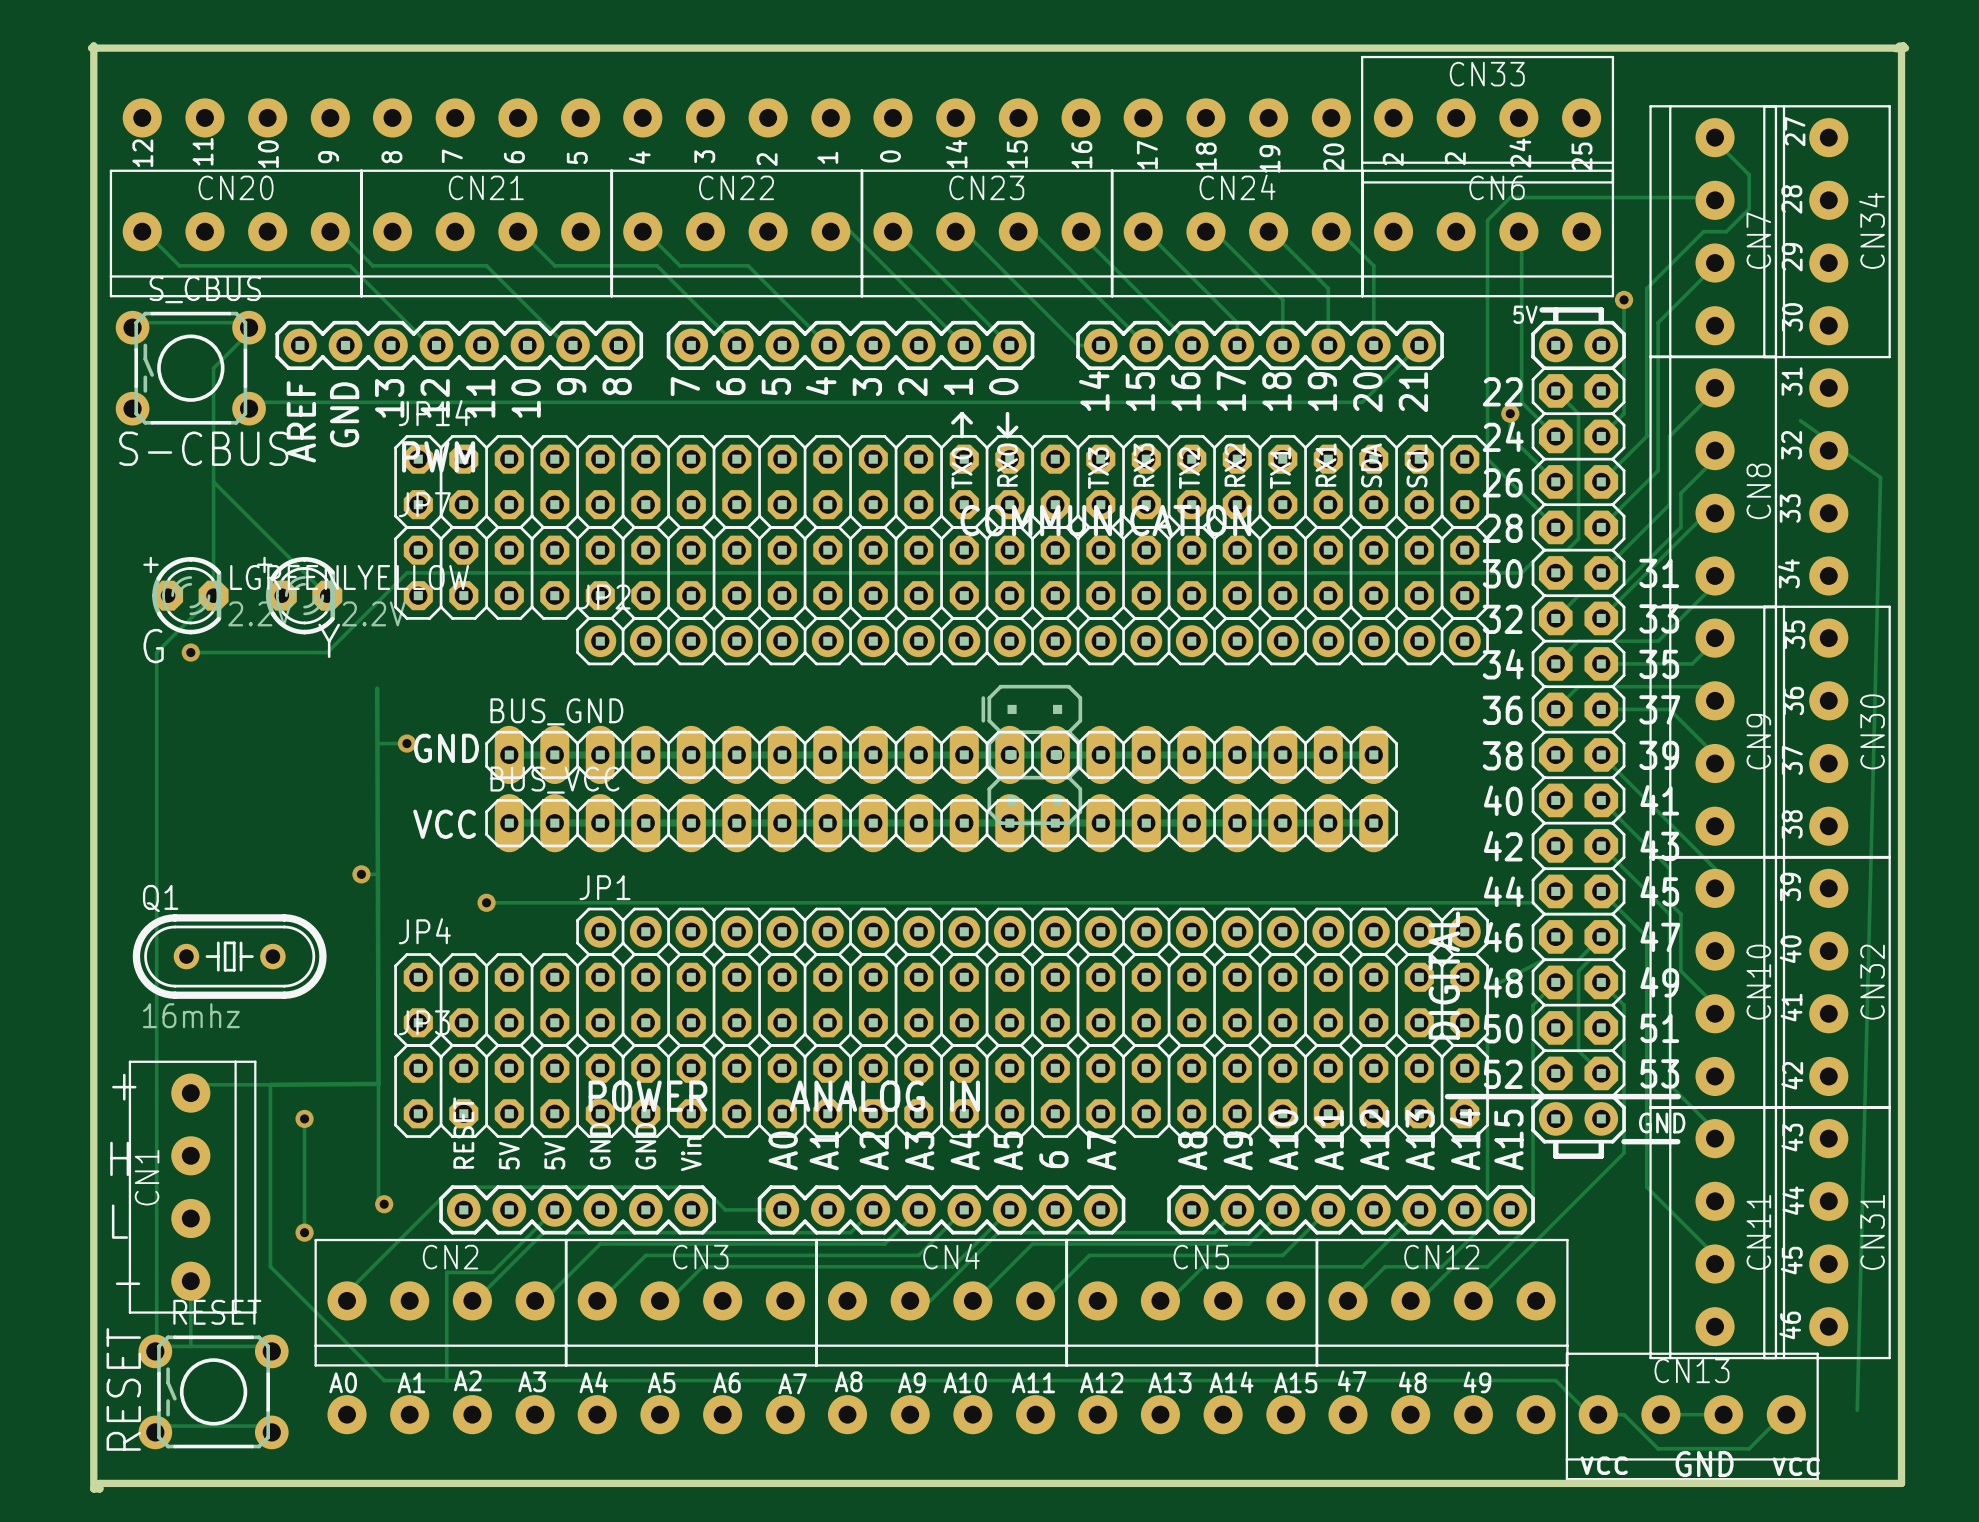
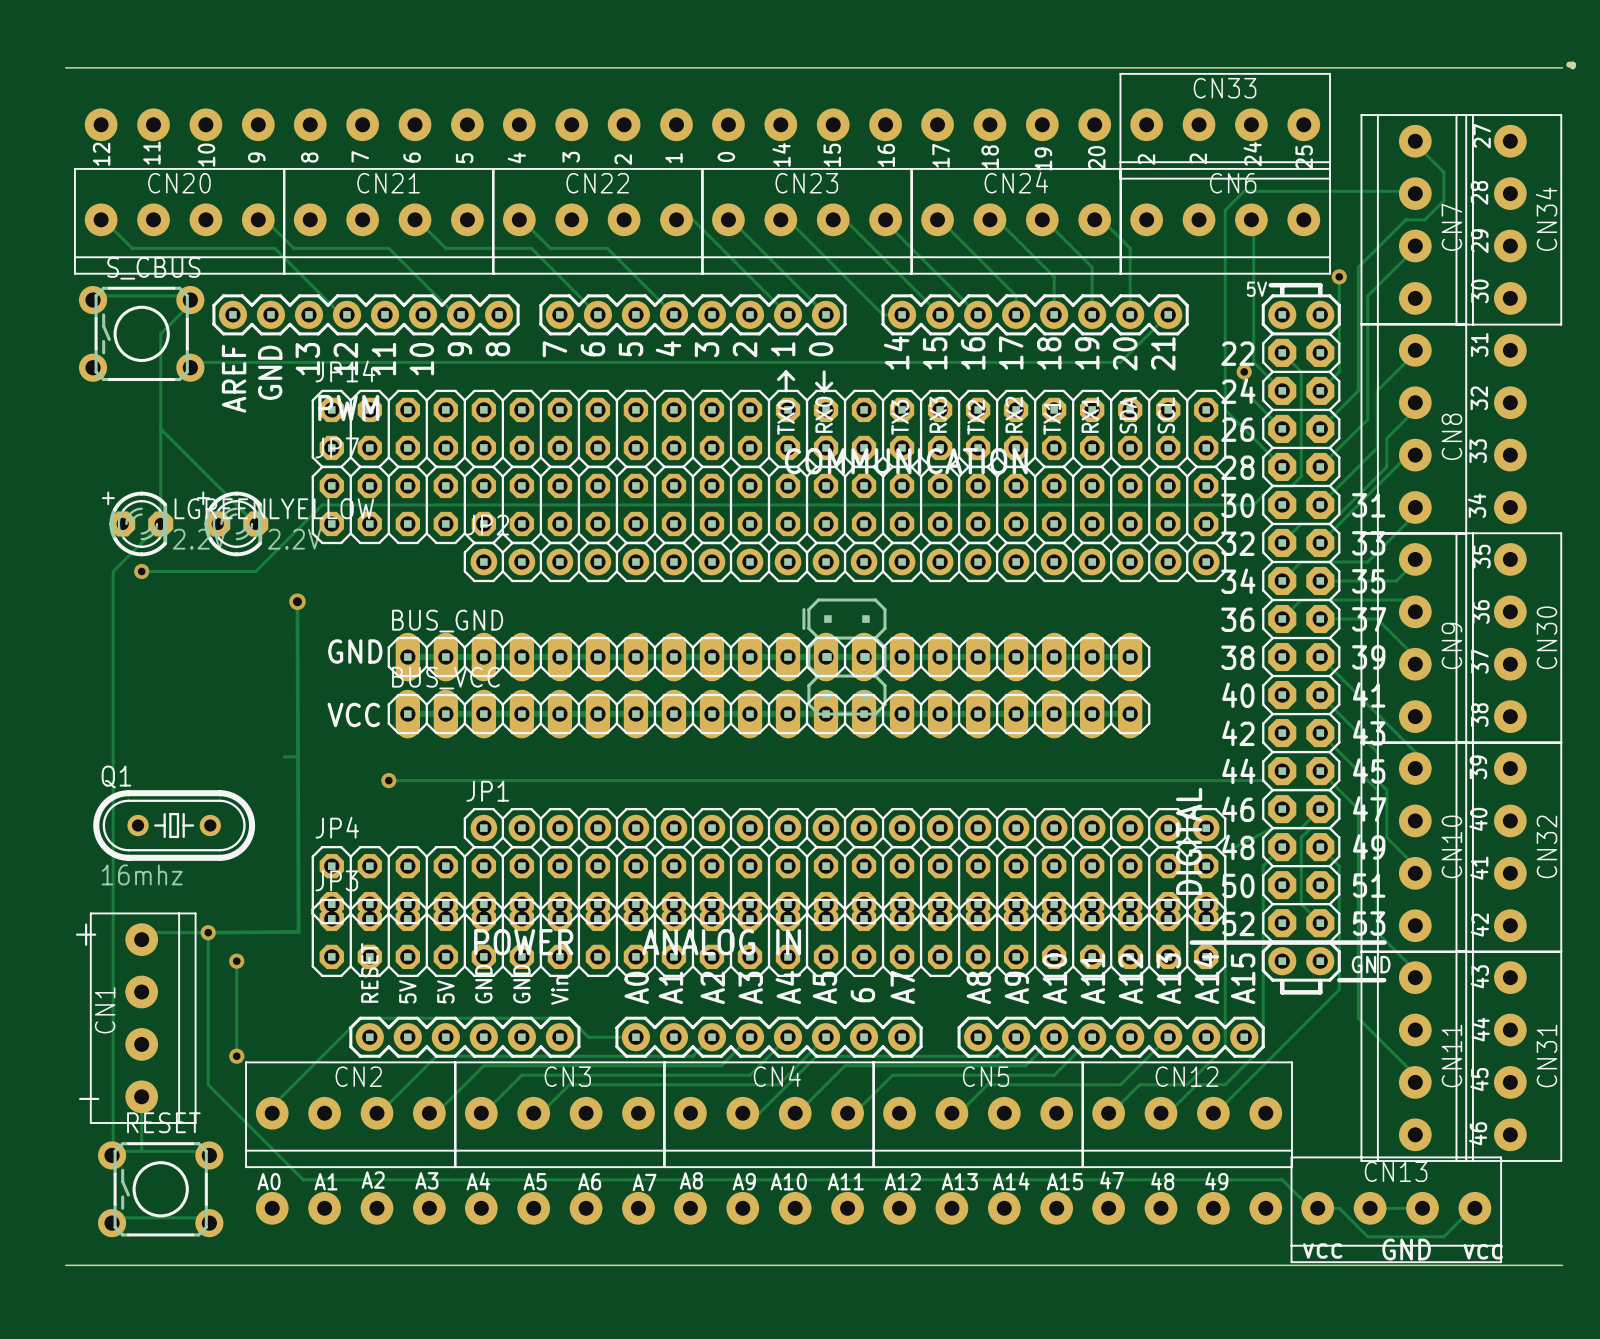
board edge: (93, 45) (93, 1488) (99, 1488) (99, 1483) (1901, 1483) (1901, 48) (1895, 48) -> none
board edge: (91, 48) (1905, 48) -> none
track: (1800, 420) (1880, 477) (1857, 1410) -> none
text: S-CBUS (203, 448) -> none
text: Y (329, 640) -> none
text: G (153, 646) -> none
via: none -> (297, 601)
track: (377, 743) (406, 743) -> none
via: (406, 743) -> none
via: (361, 874) -> none
JP1 position: (1032, 931) -> (845, 828)
JP4 position: (941, 1000) -> (769, 885)
track: (378, 1083) (378, 1198) (384, 1204) -> none
via: none -> (208, 932)
text: H (119, 1158) -> none
via: (384, 1204) -> none
track: (554, 1209) (492, 1272) (446, 1272) (446, 1380) -> none
text: L (119, 1221) -> none
text: RESET (123, 1389) -> none

